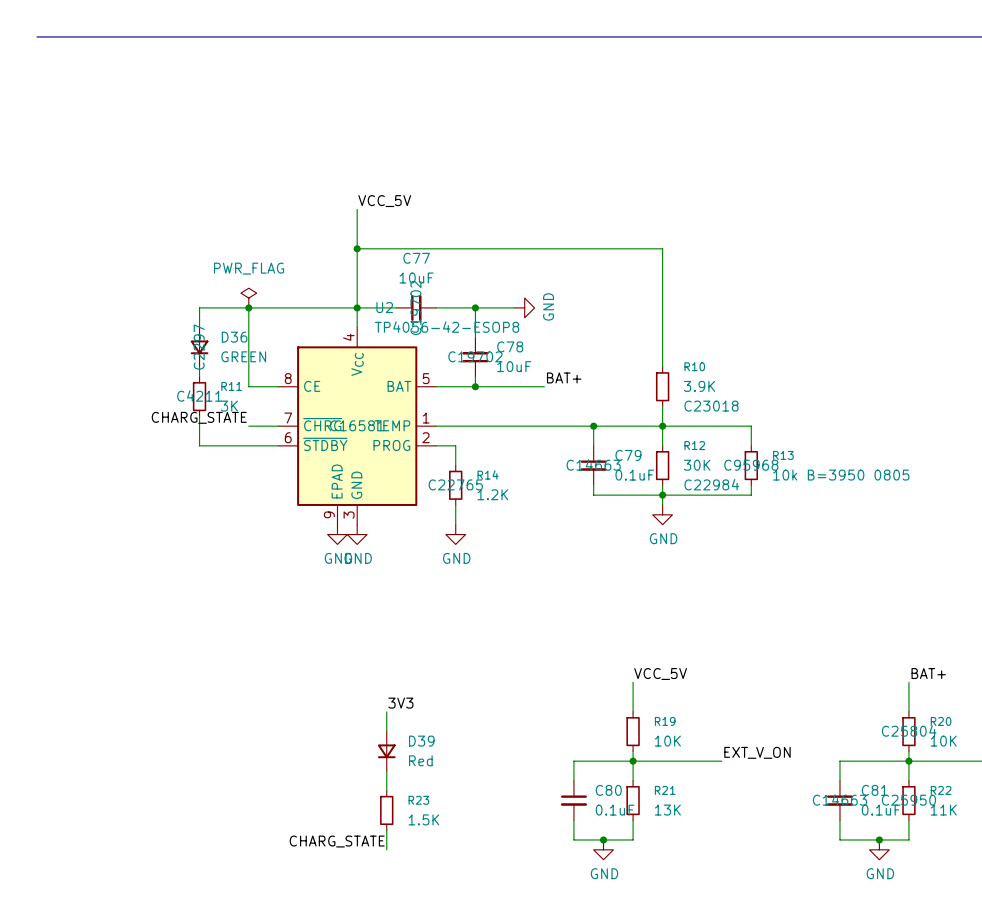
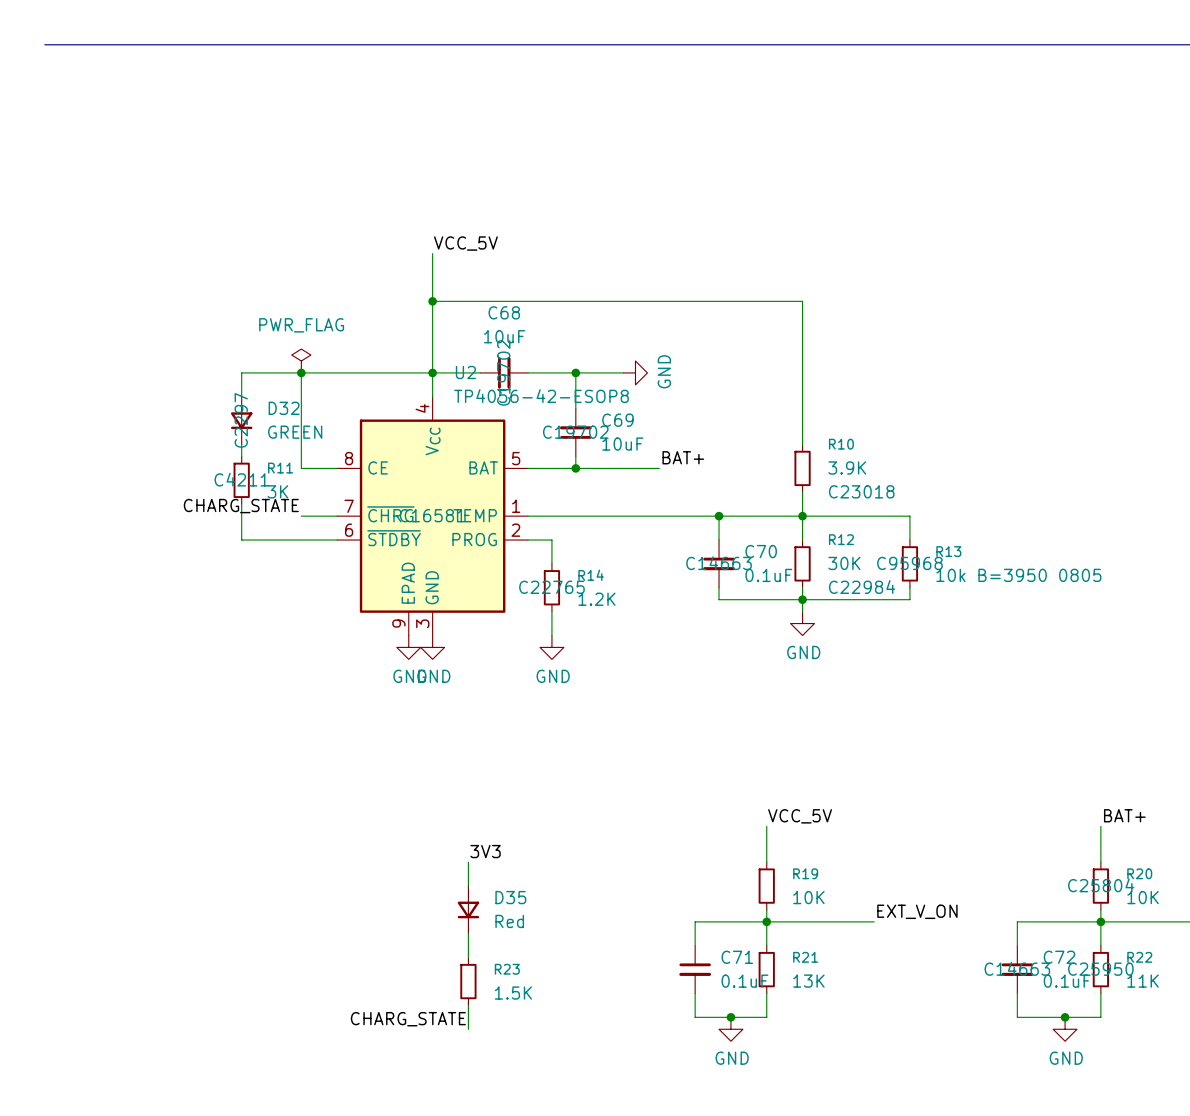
C77 name: C77 (416, 258) -> C68 (504, 312)
D36 name: D36 (234, 337) -> D32 (284, 408)
C78 name: C78 (510, 346) -> C69 (617, 420)
C79 name: C79 (628, 455) -> C70 (761, 551)
D39 name: D39 (421, 741) -> D35 (510, 897)
C80 name: C80 (608, 790) -> C71 (737, 957)
C81 name: C81 (874, 790) -> C72 (1059, 957)

